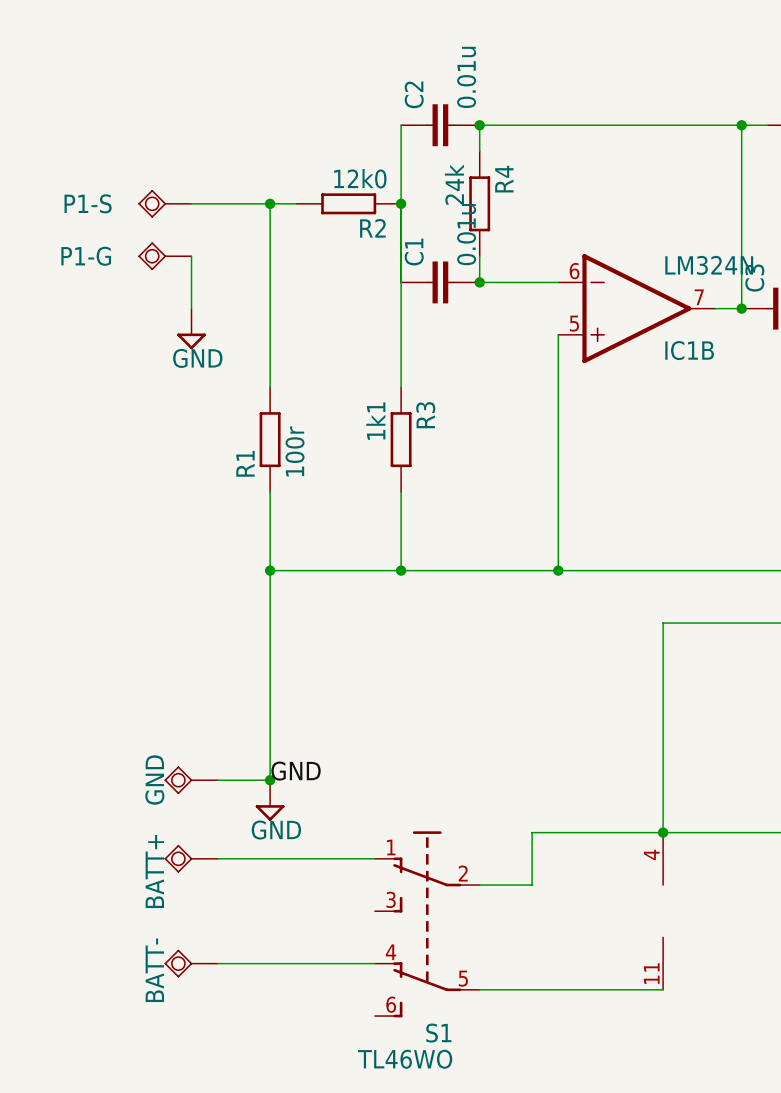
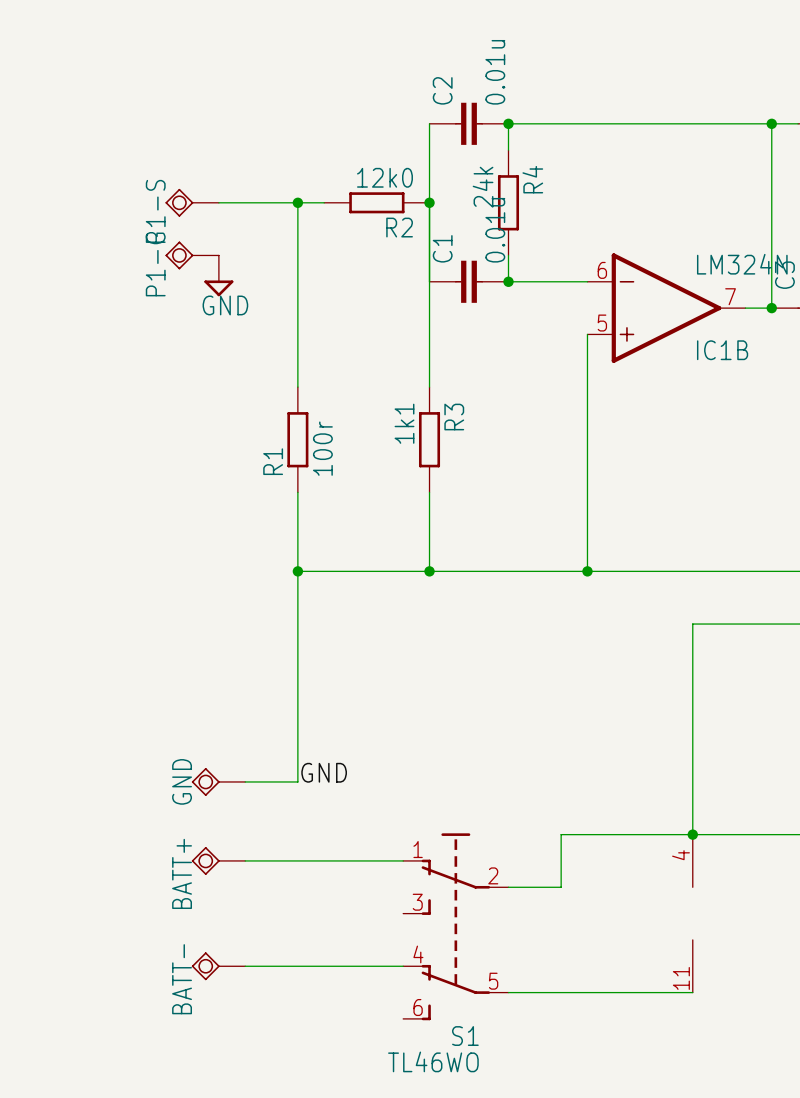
P1-S name rotation: 0° (88, 203) -> 90° counterclockwise (155, 211)
P1-G name rotation: 0° (86, 256) -> 90° counterclockwise (155, 264)
power symbol position: GND (191, 328) -> GND (218, 275)
junction: (270, 780) -> none
power symbol: GND (270, 800) -> none

